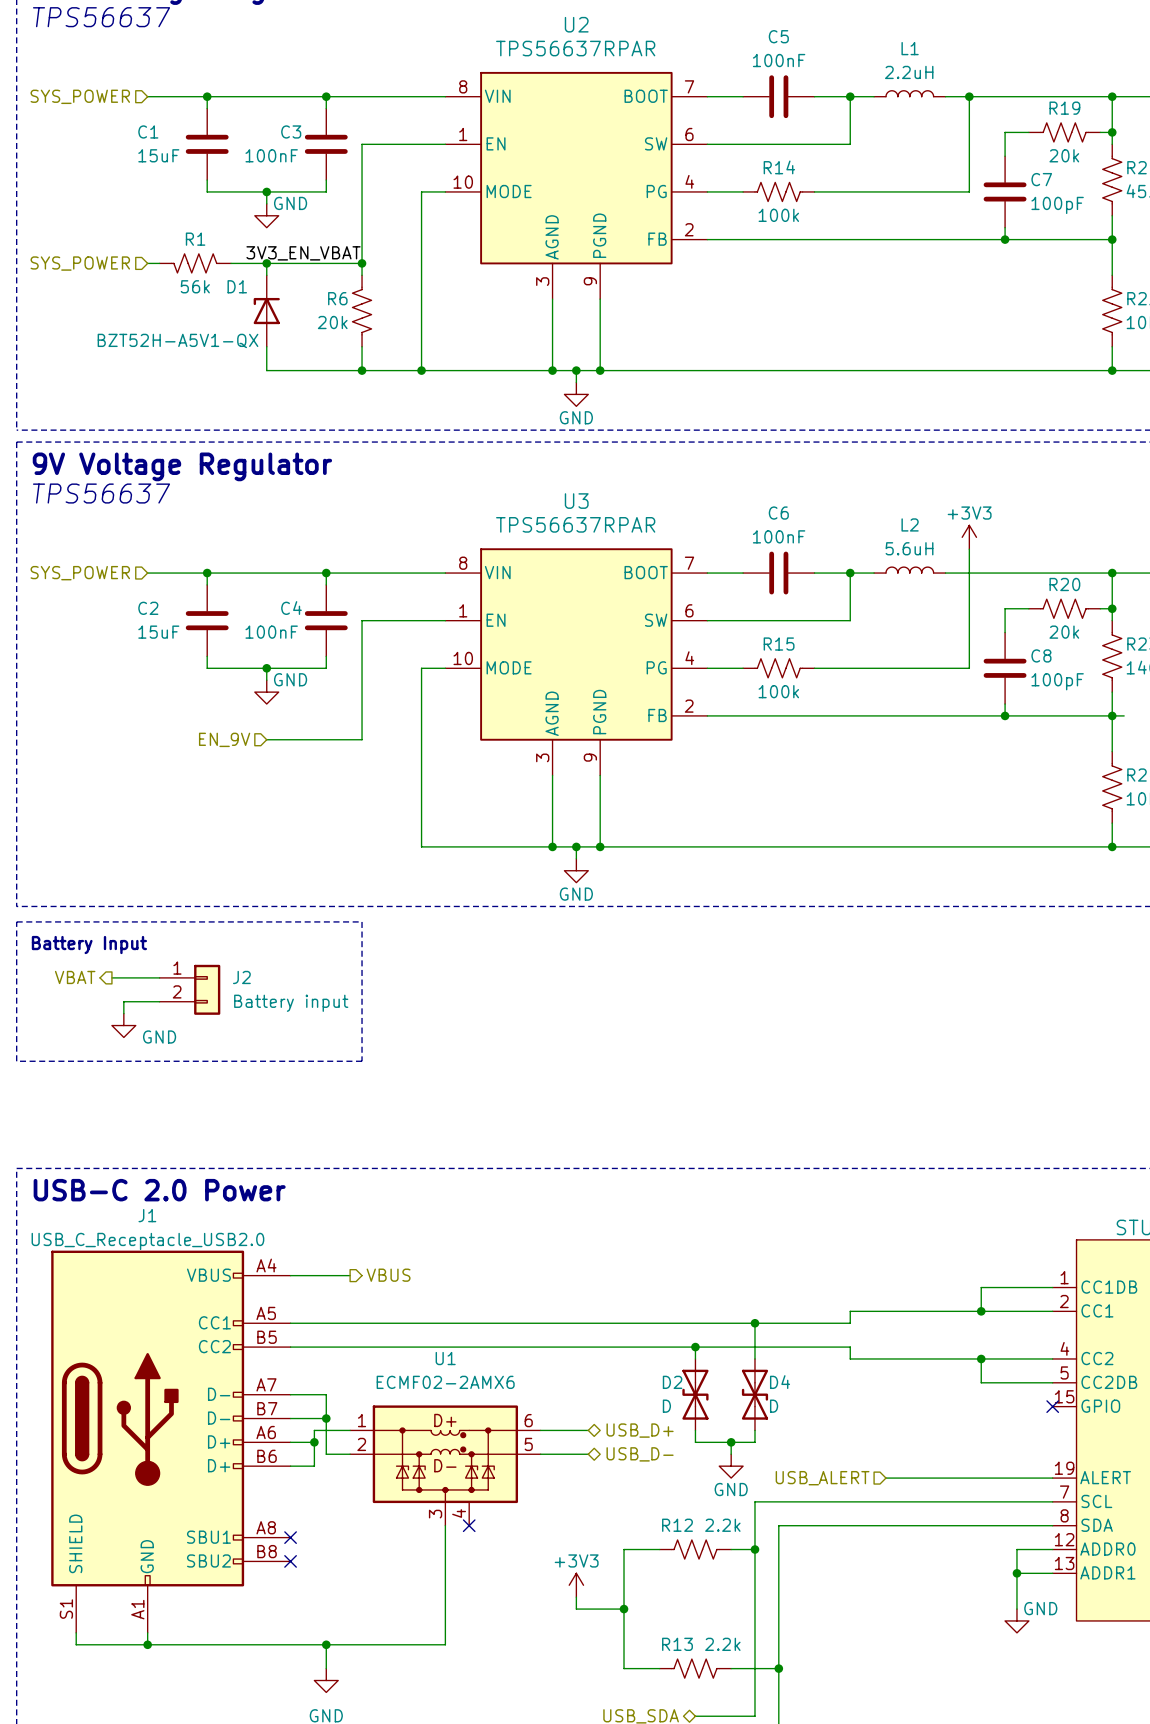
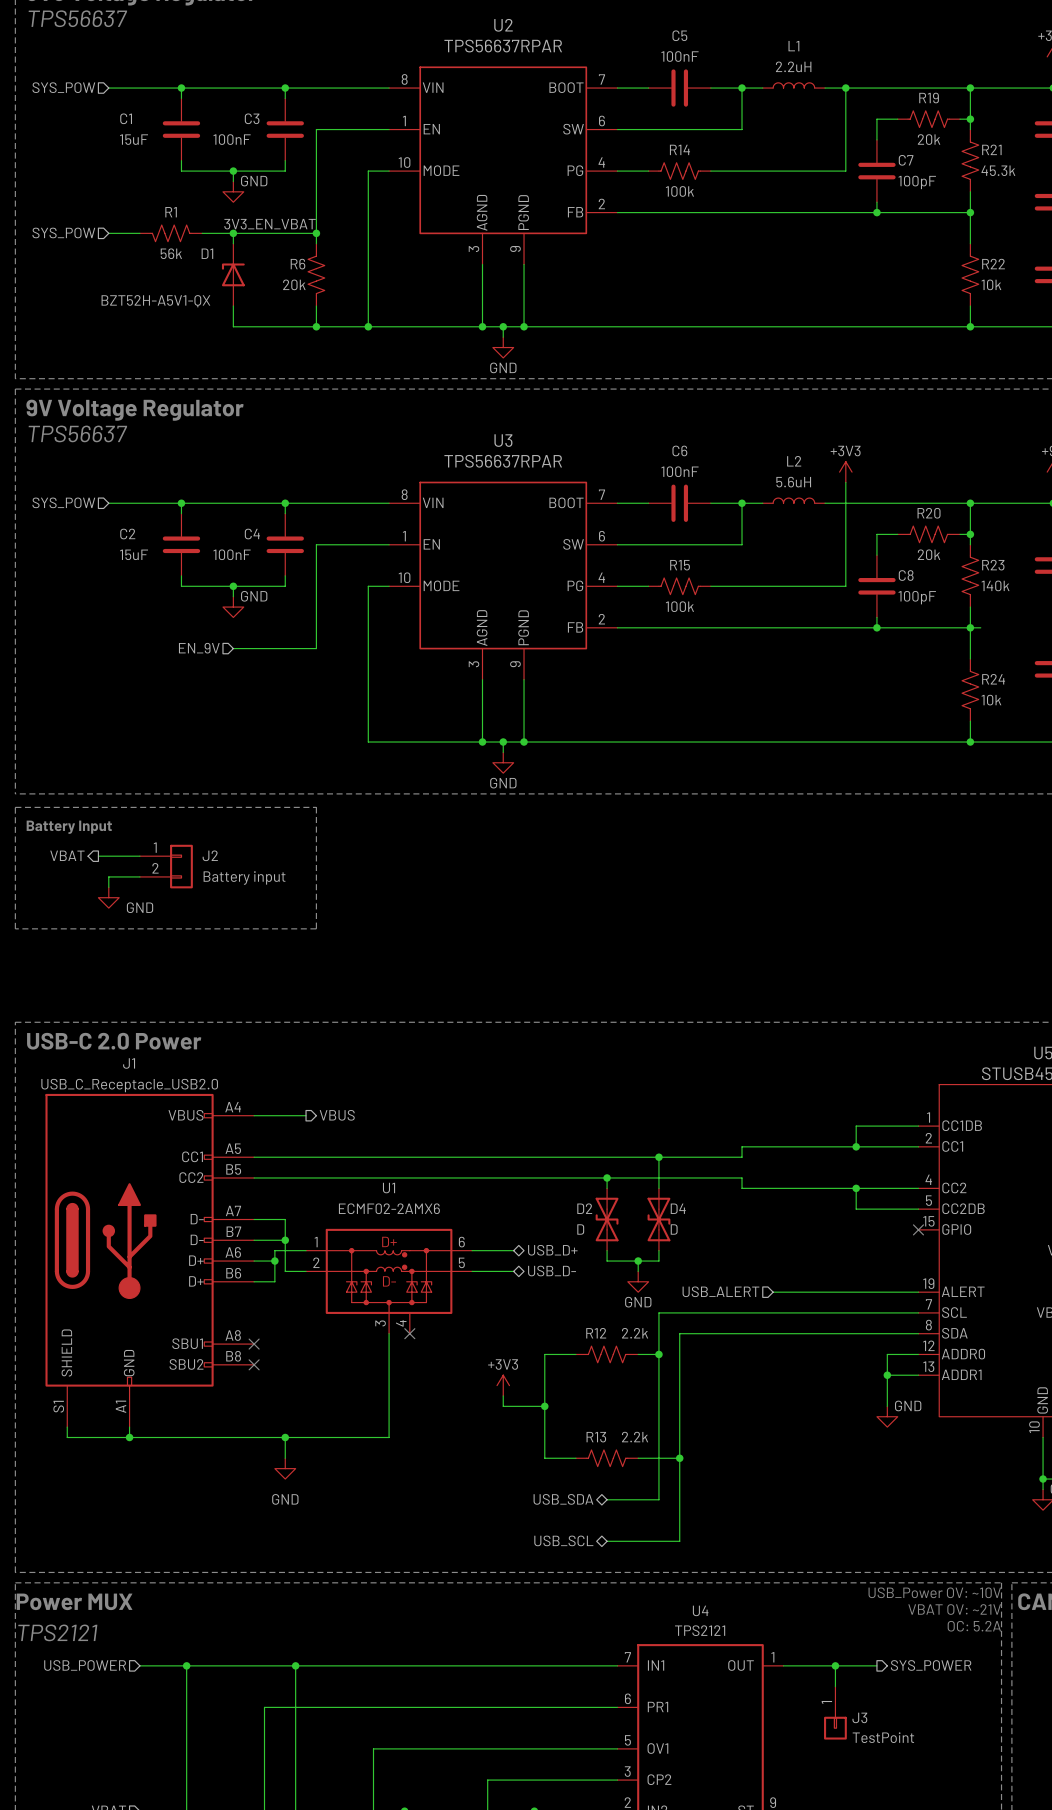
hierarchical label: SYS_POWER (80, 96) -> SYS_POW (63, 87)
wire: none -> (108, 88) (129, 88)
hierarchical label: SYS_POWER (80, 263) -> SYS_POW (63, 232)
wire: none -> (108, 233) (129, 233)
hierarchical label: SYS_POWER (80, 573) -> SYS_POW (63, 502)
wire: none -> (108, 503) (129, 503)

